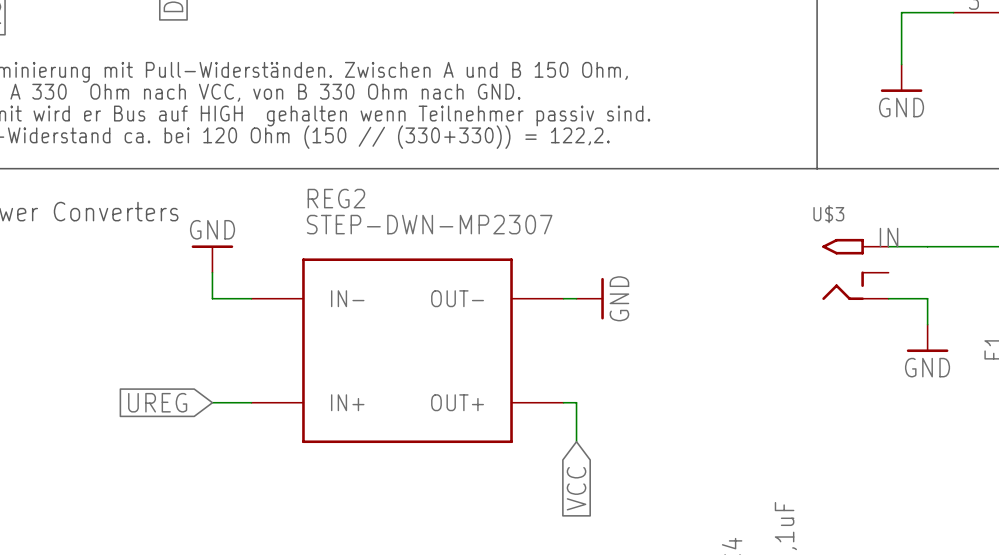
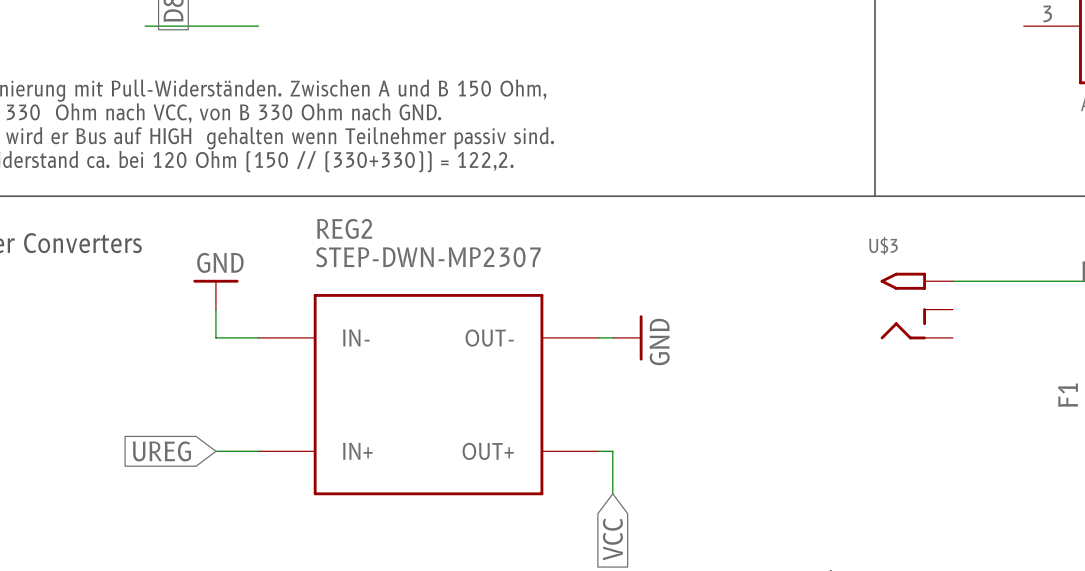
wire: none -> (145, 26) (258, 26)
wire: (953, 12) (901, 12) (901, 64) -> none
power symbol: GND (901, 78) -> none
label: IN (889, 237) -> none
wire: (888, 298) (927, 298) (927, 324) -> none
power symbol: GND (927, 338) -> none

